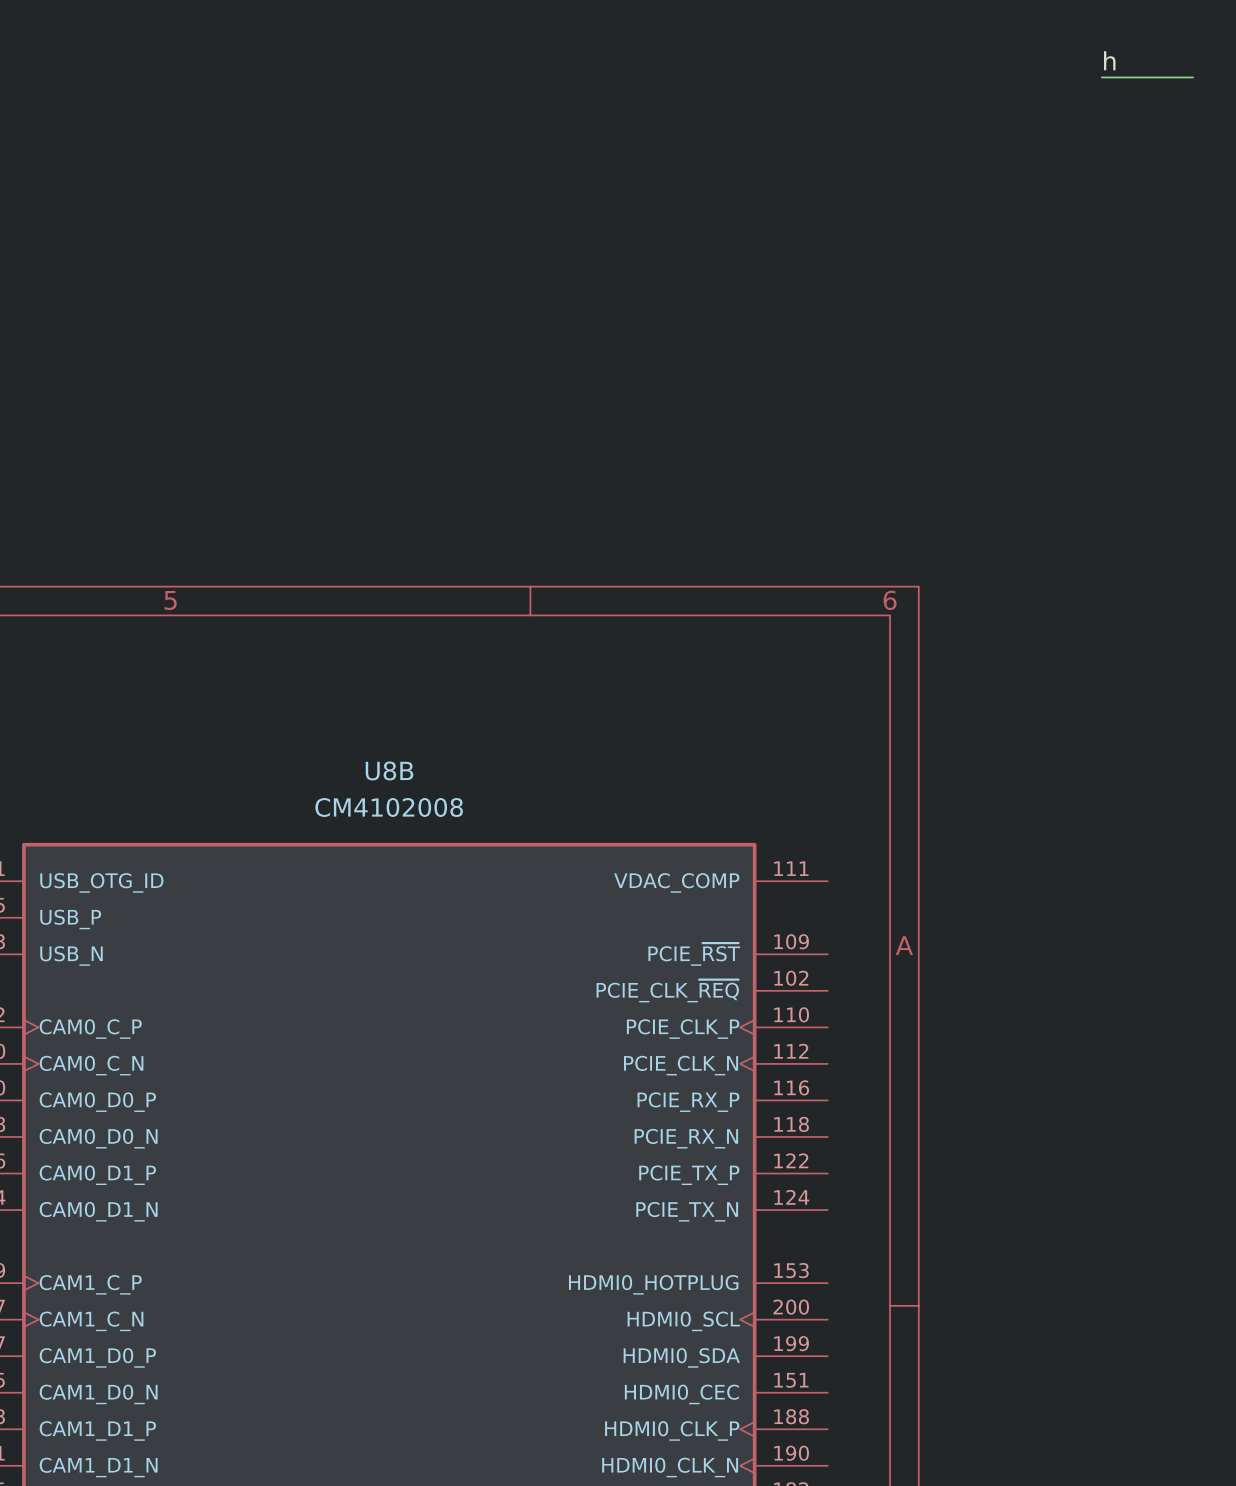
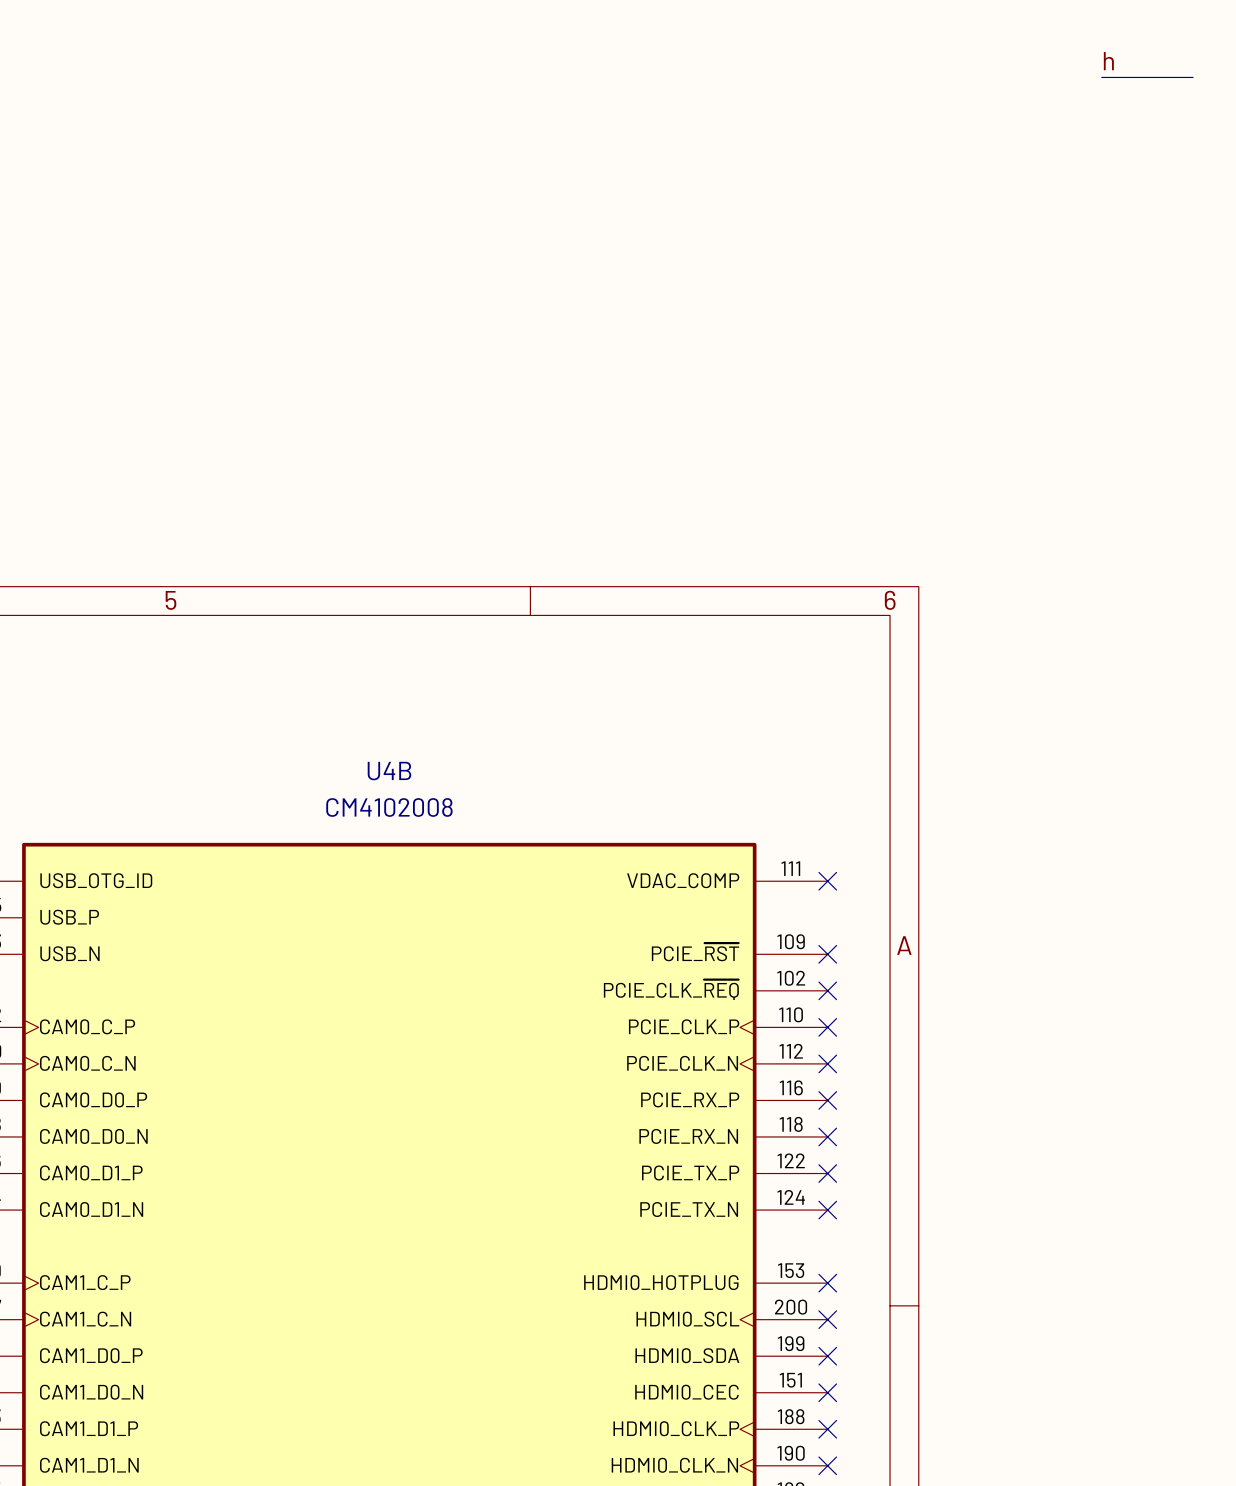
U8B name: U8B (389, 770) -> U4B (389, 771)
no-connect mark: none -> (827, 881)
no-connect mark: none -> (827, 954)
no-connect mark: none -> (827, 990)
no-connect mark: none -> (827, 1027)
no-connect mark: none -> (827, 1063)
no-connect mark: none -> (827, 1100)
no-connect mark: none -> (827, 1136)
no-connect mark: none -> (827, 1173)
no-connect mark: none -> (827, 1210)
no-connect mark: none -> (827, 1283)
no-connect mark: none -> (827, 1319)
no-connect mark: none -> (827, 1356)
no-connect mark: none -> (827, 1392)
no-connect mark: none -> (827, 1429)
no-connect mark: none -> (827, 1465)

